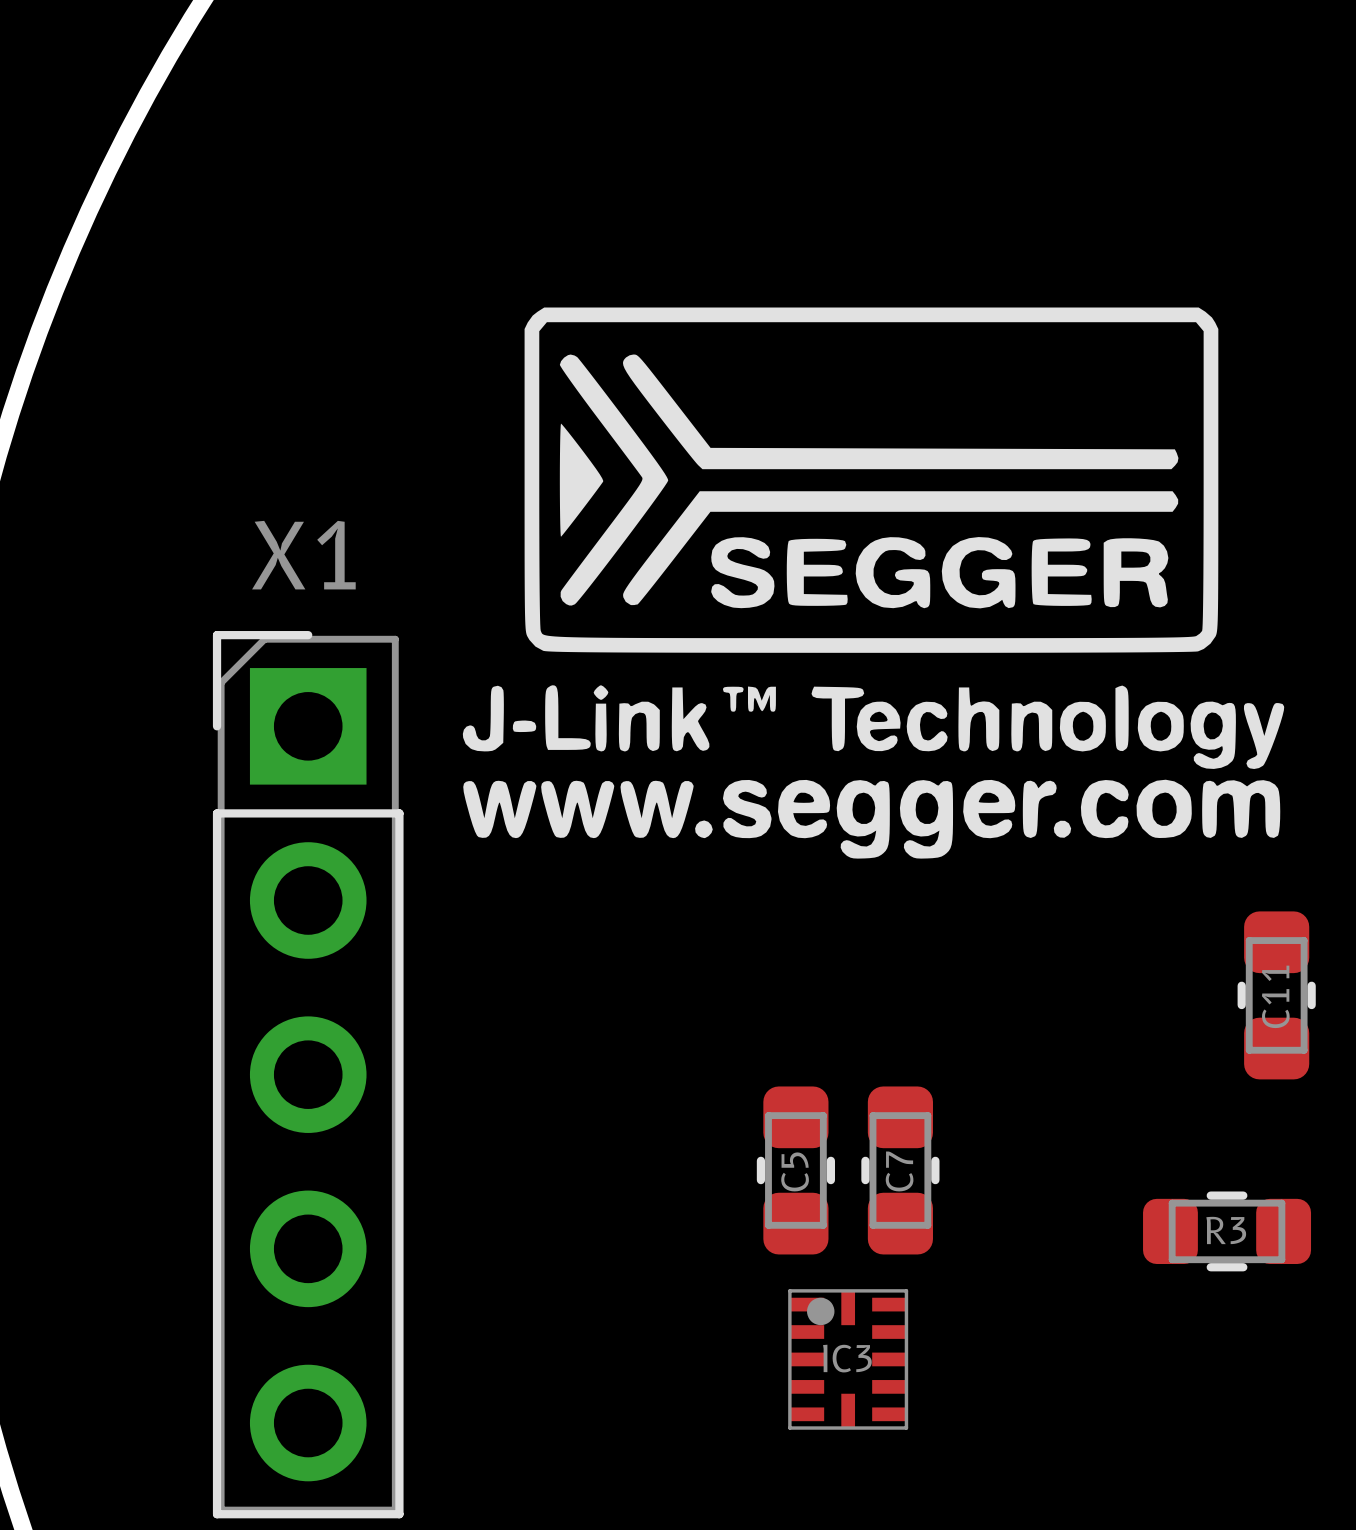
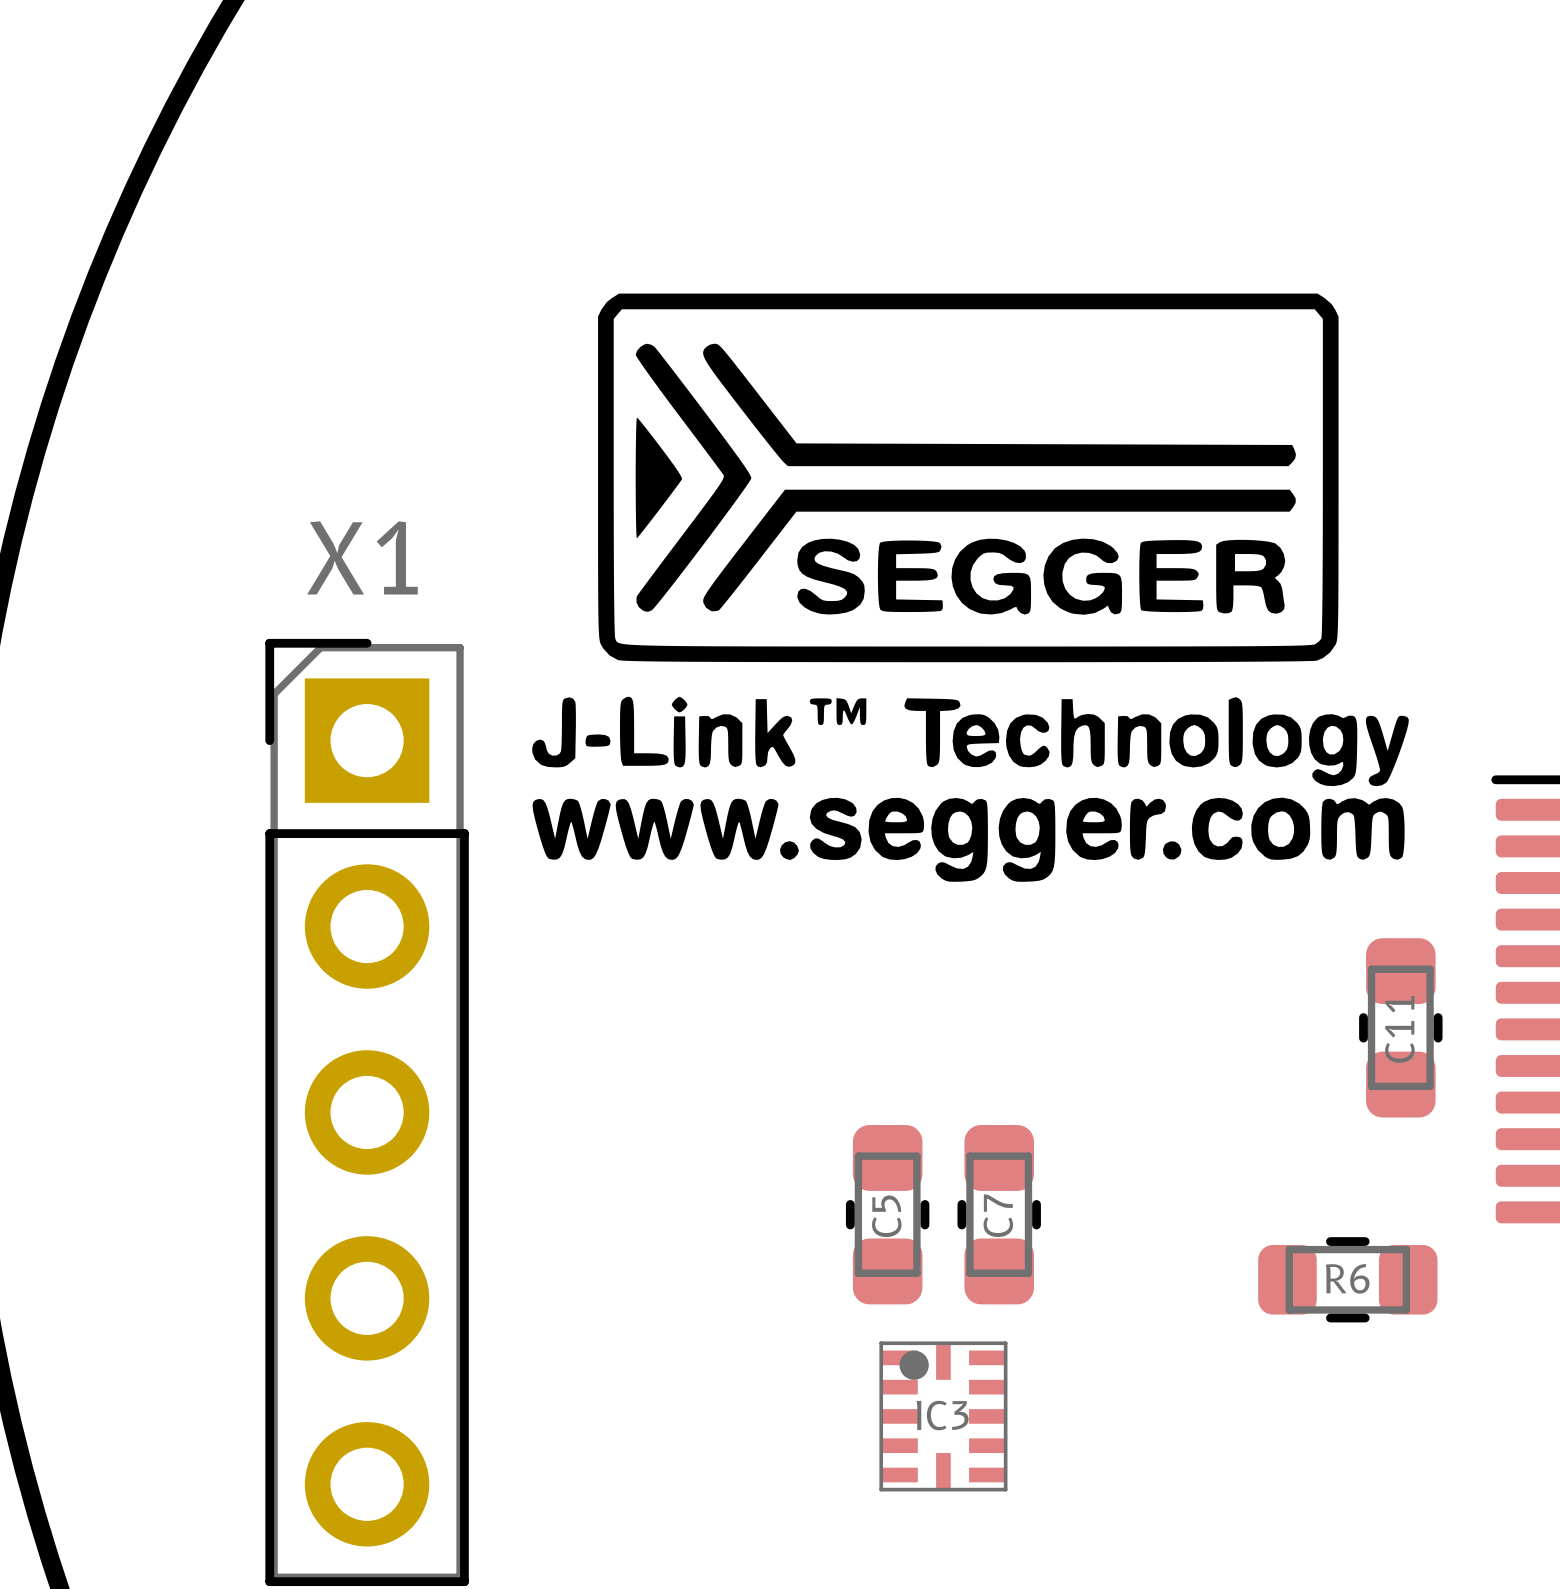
R3 name: R3 (1226, 1230) -> R6 (1347, 1278)

